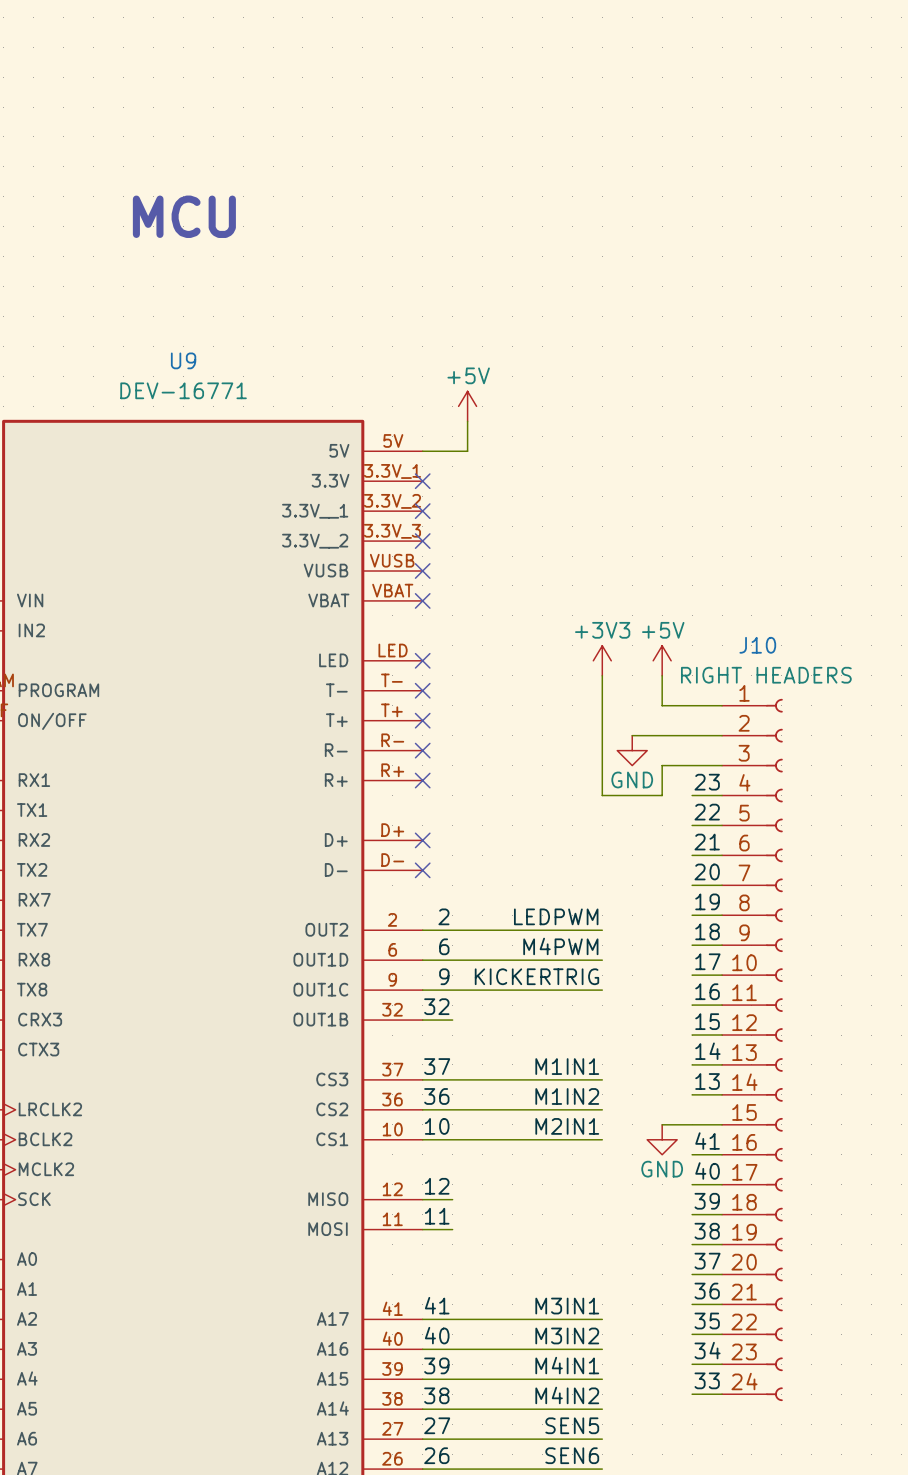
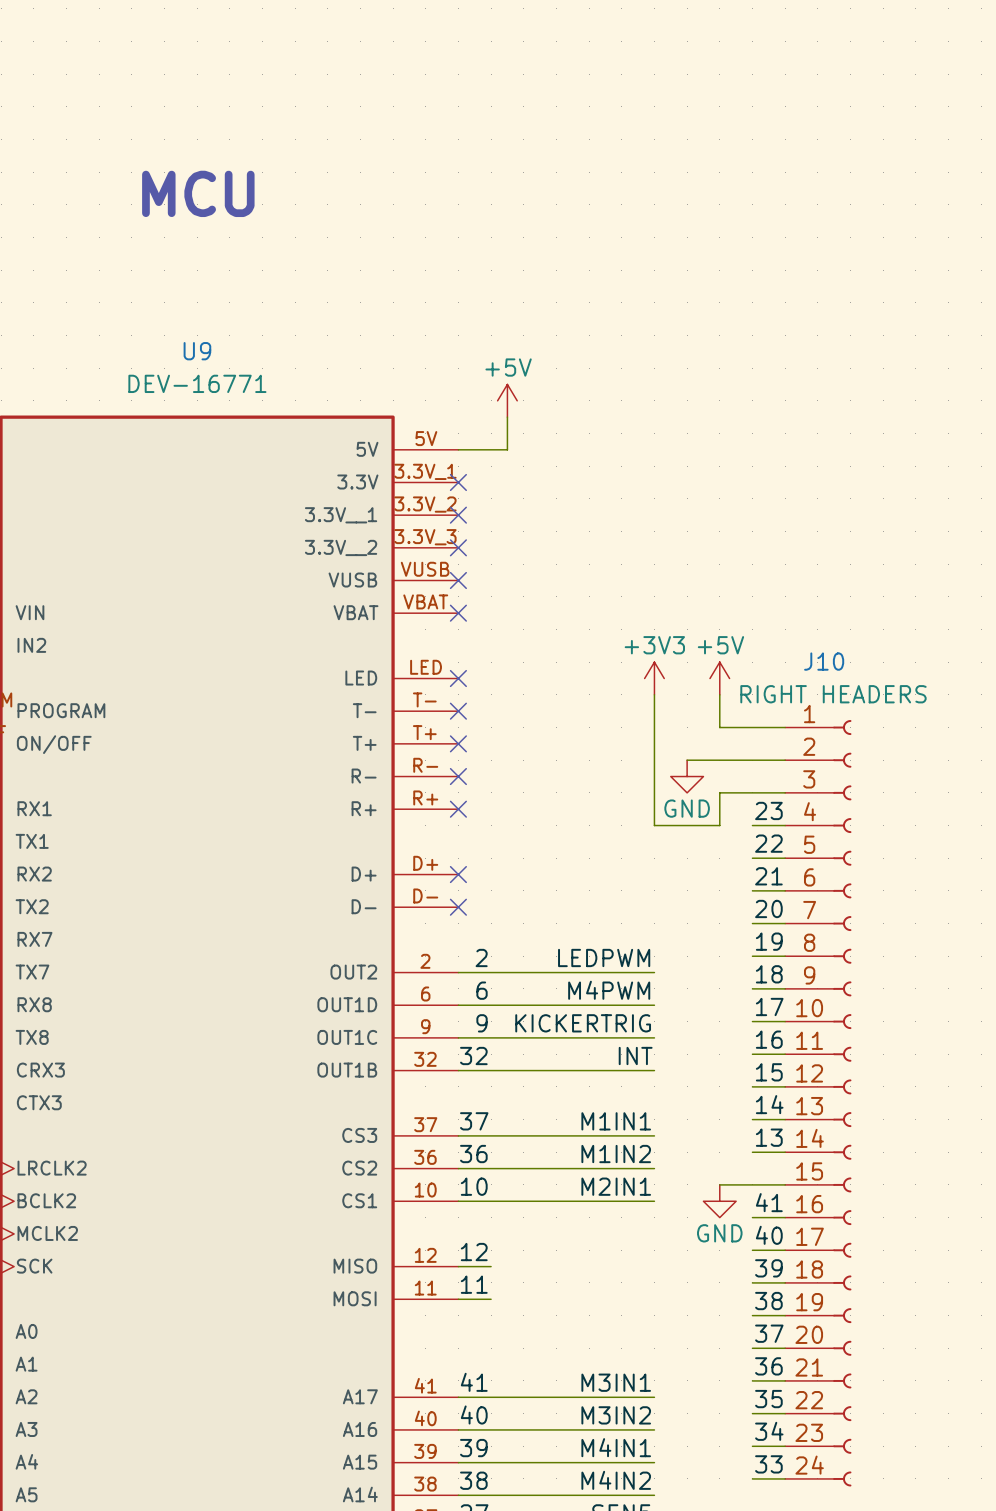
label: none -> INT (635, 1056)
wire: none -> (491, 1070) (654, 1070)

